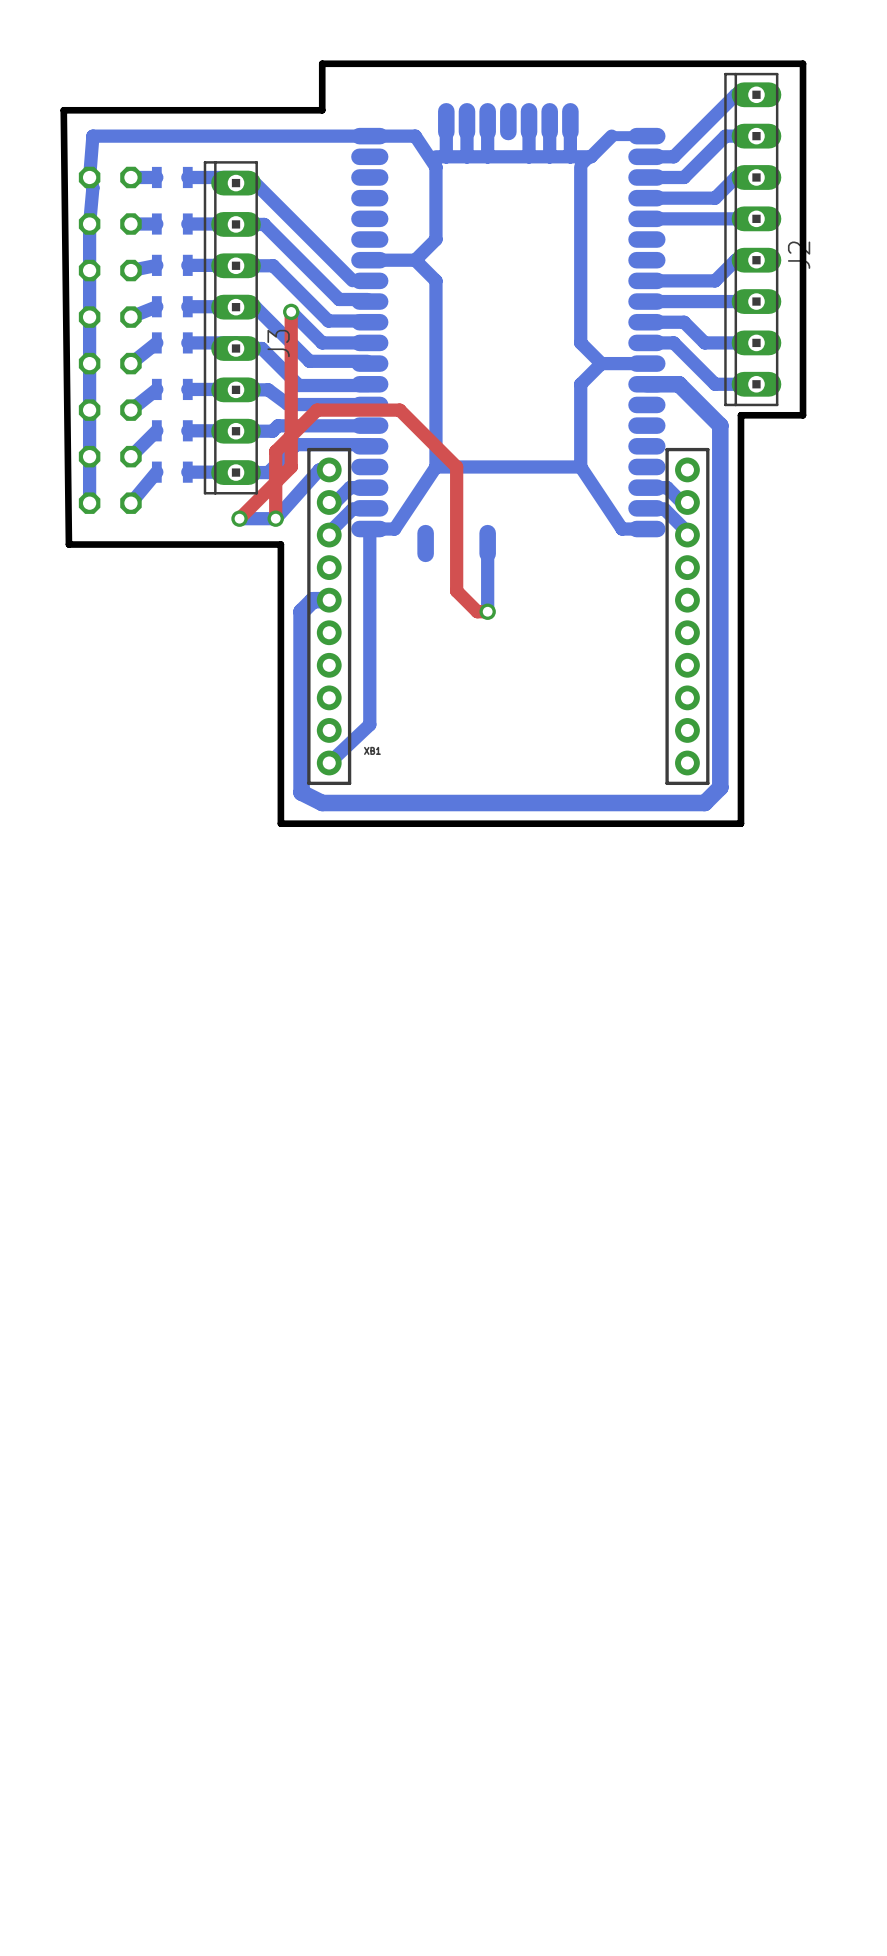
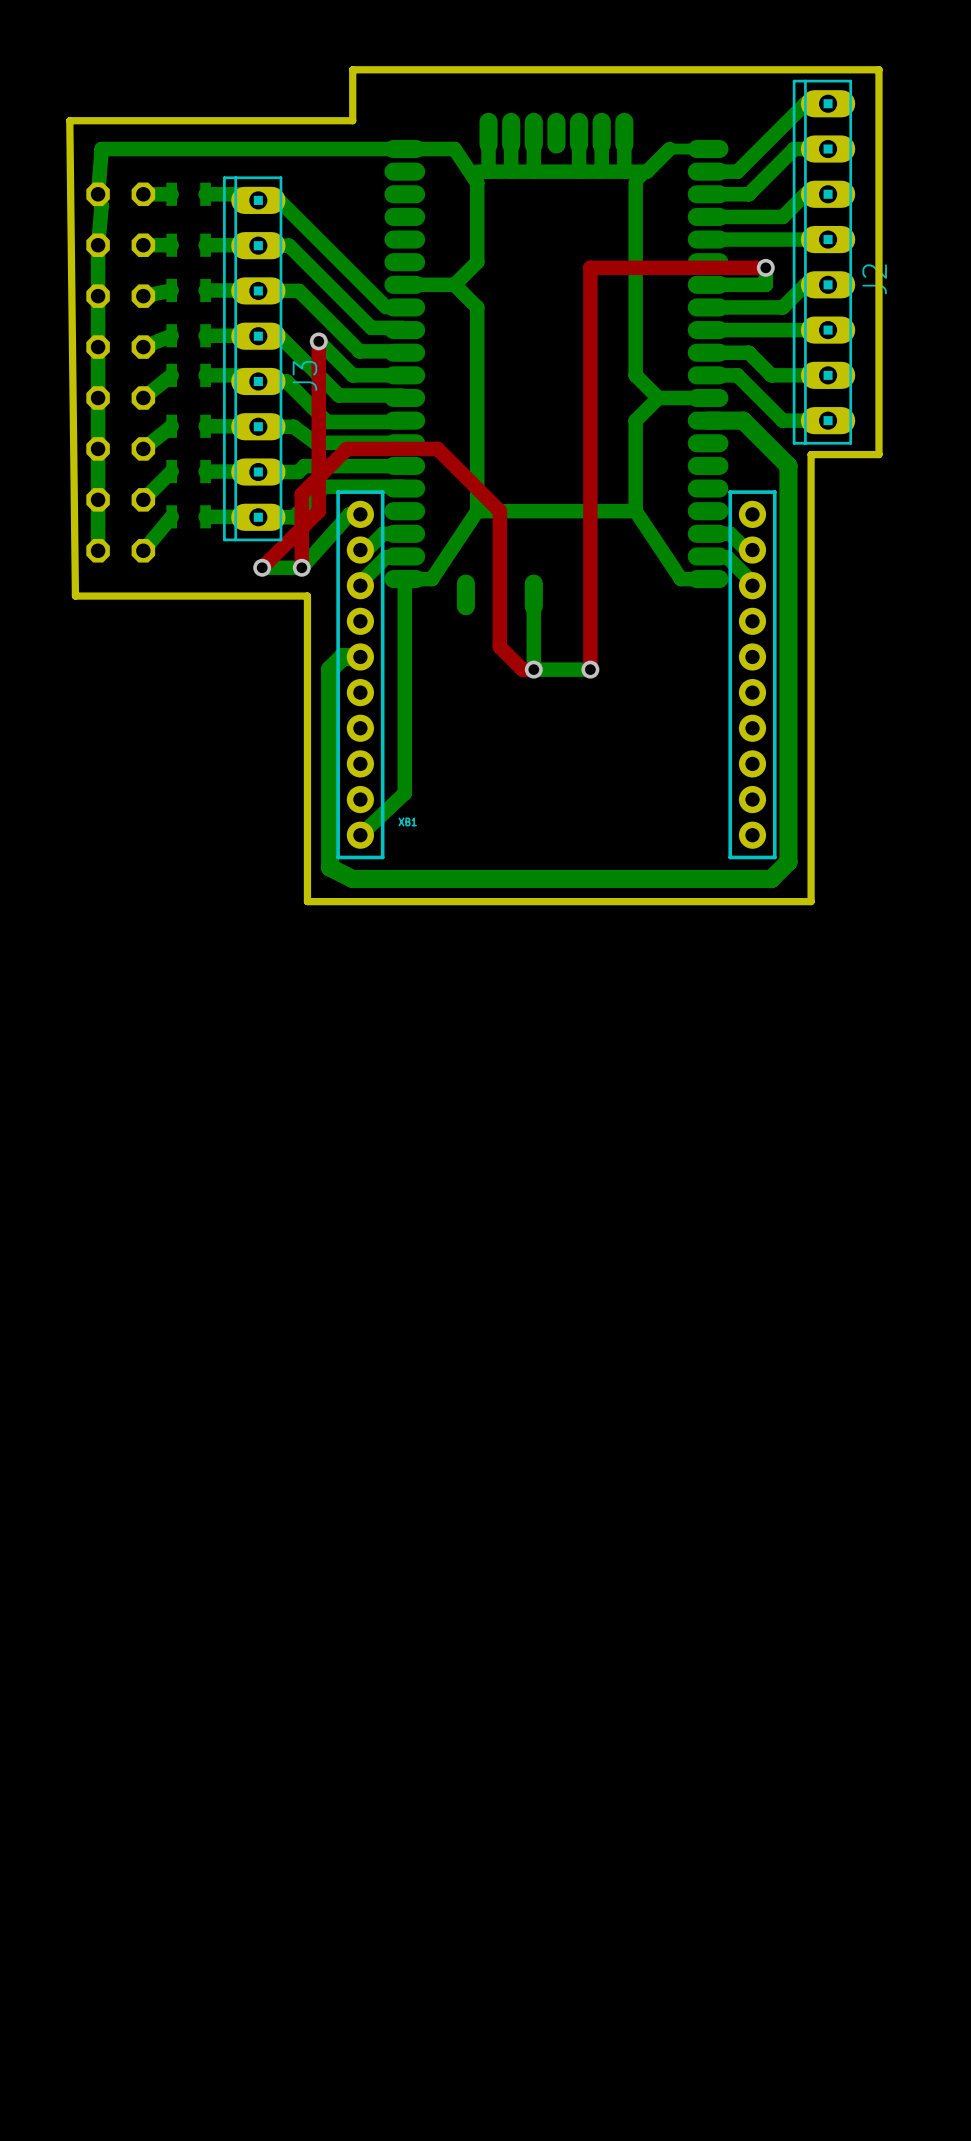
bottom track: none -> (765, 267) (765, 284) (708, 284)
top track: none -> (765, 267) (590, 267) (590, 669)
via: none -> (765, 267)
bottom track: none -> (533, 669) (590, 669)
via: none -> (590, 669)

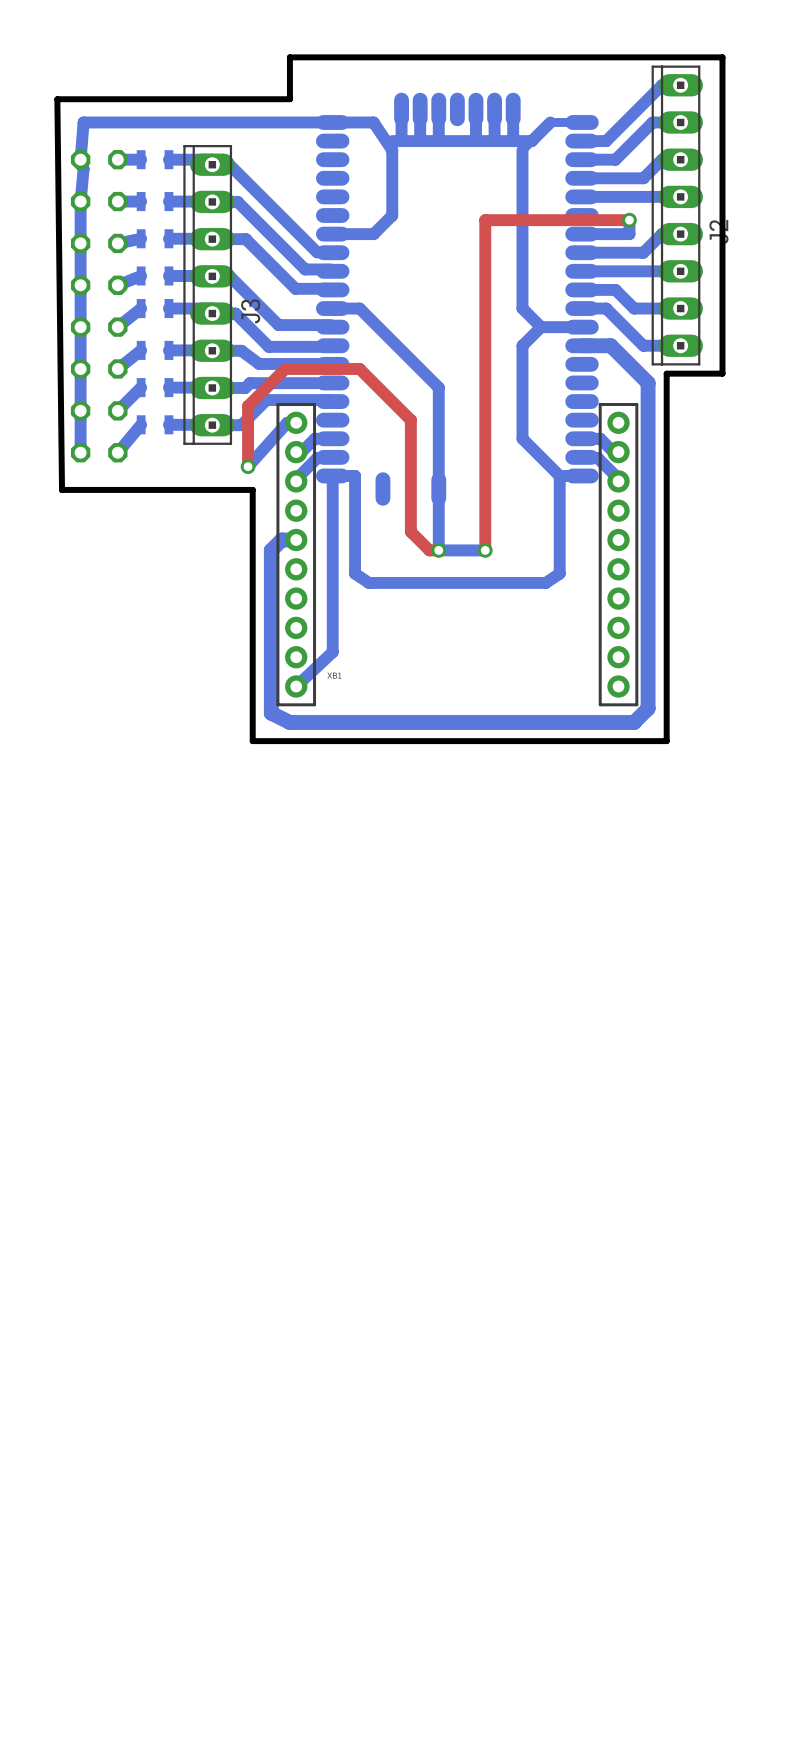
bottom track: (454, 284) (477, 307) (477, 511) -> none
bottom track: (318, 341) (352, 375) (404, 375) -> (438, 489) (438, 387) (359, 308) (332, 308)
top track: (318, 341) (318, 511) (262, 567) -> none
via: (318, 341) -> none
bottom track: (477, 511) (431, 579) -> (522, 420) (522, 438) (559, 475) (559, 573) (545, 582) (369, 582) (355, 573) (355, 475)
bottom track: (477, 511) (635, 511) (680, 579) -> none
bottom track: (262, 567) (301, 567) -> none
via: (262, 567) -> none

